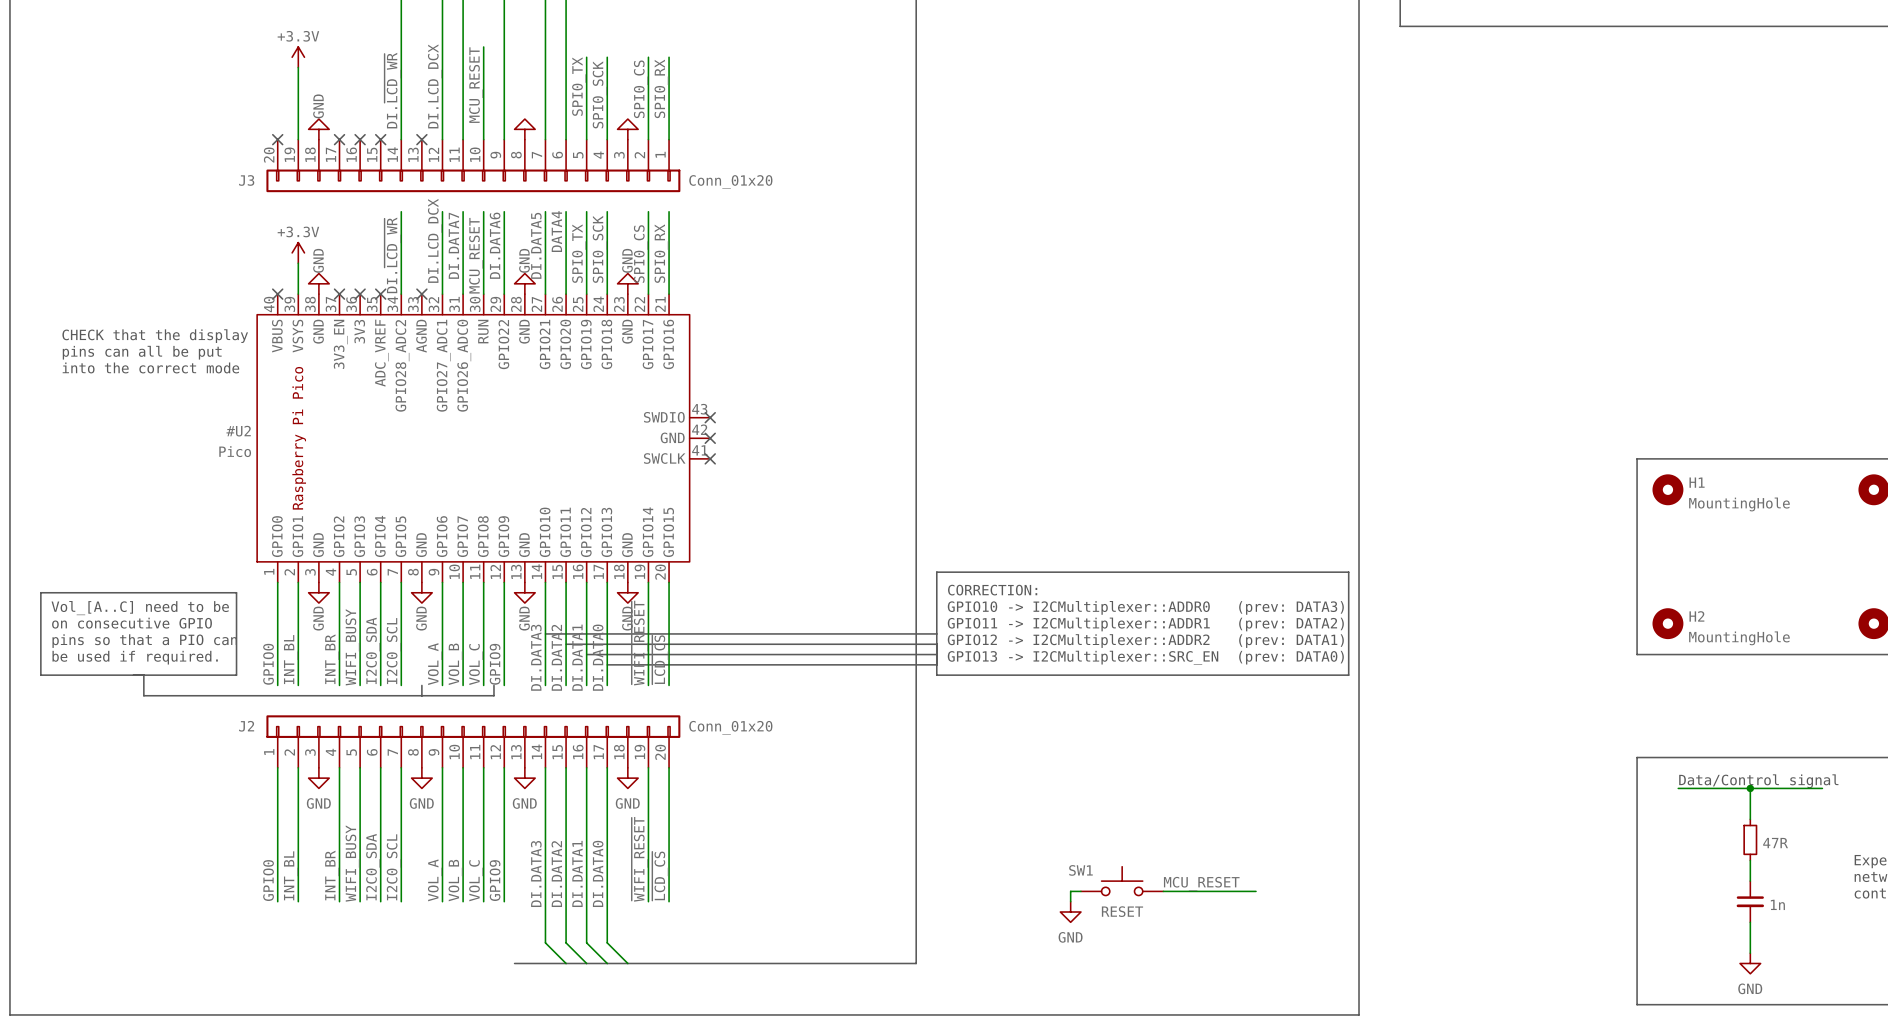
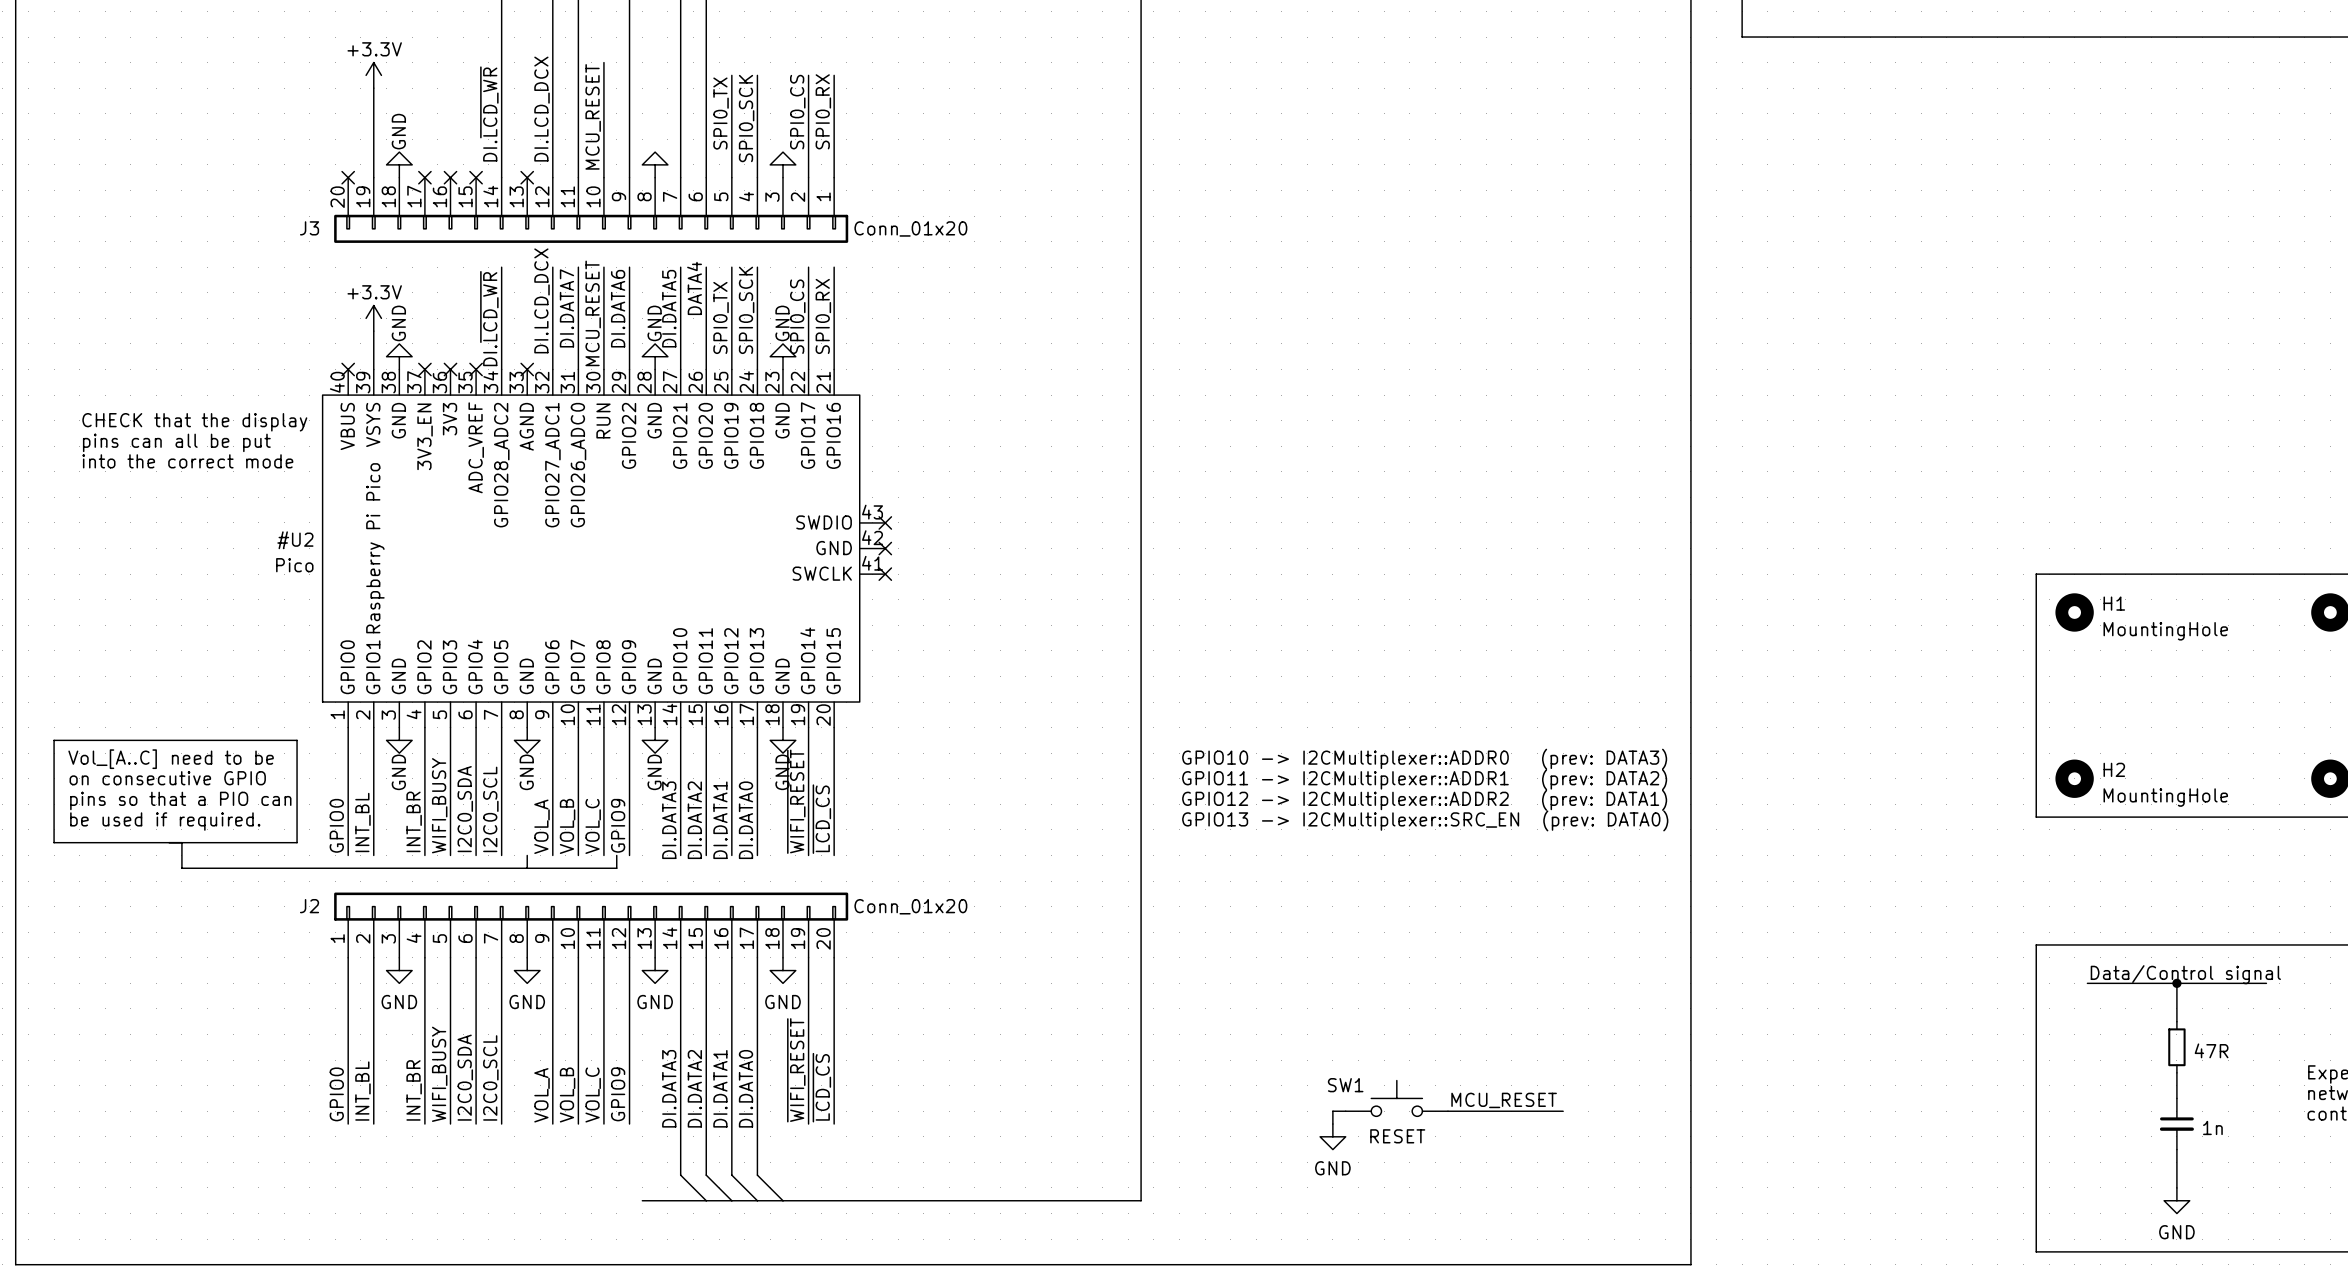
line: (936, 572) (1348, 572) (1348, 675) (936, 675) (936, 572) -> none
text: CORRECTION: (992, 590) -> none
line: (545, 633) (936, 633) -> none
line: (566, 644) (936, 644) -> none
line: (586, 654) (936, 654) -> none
line: (607, 664) (936, 664) -> none

